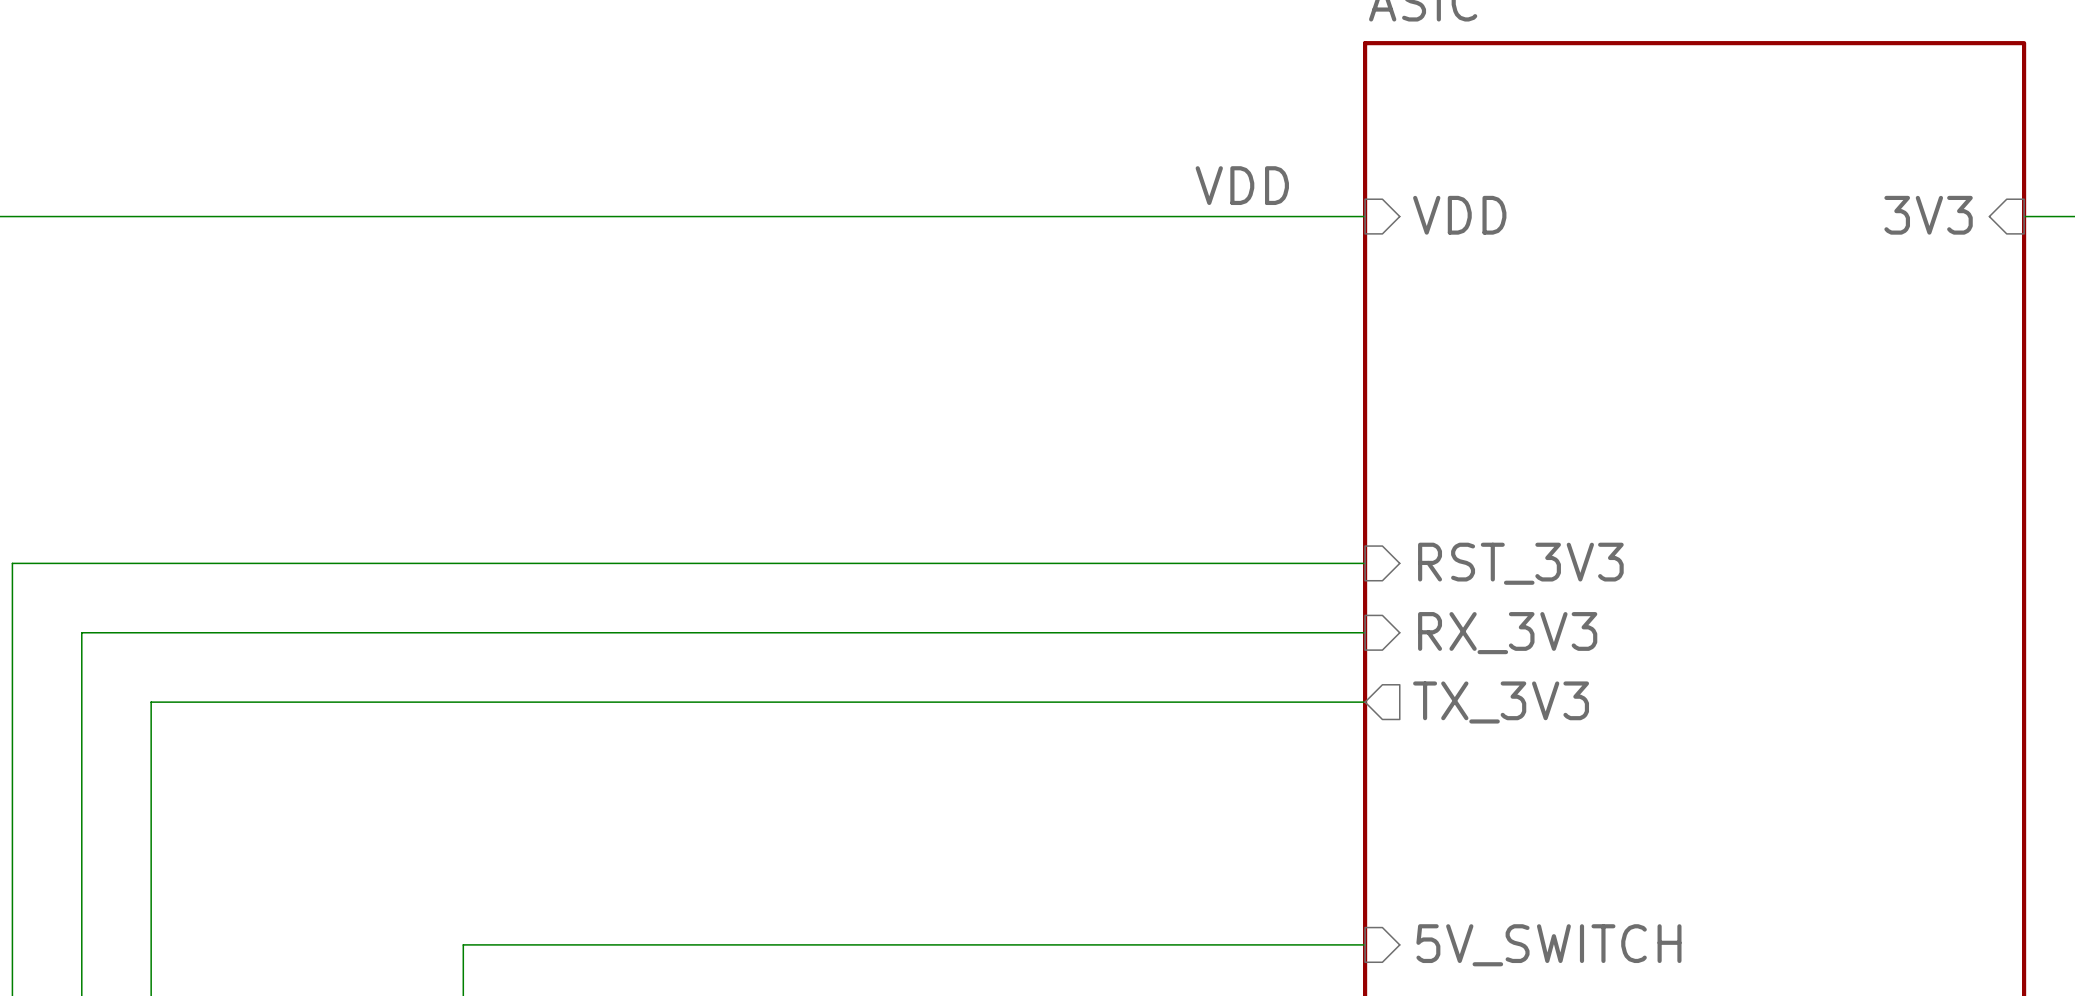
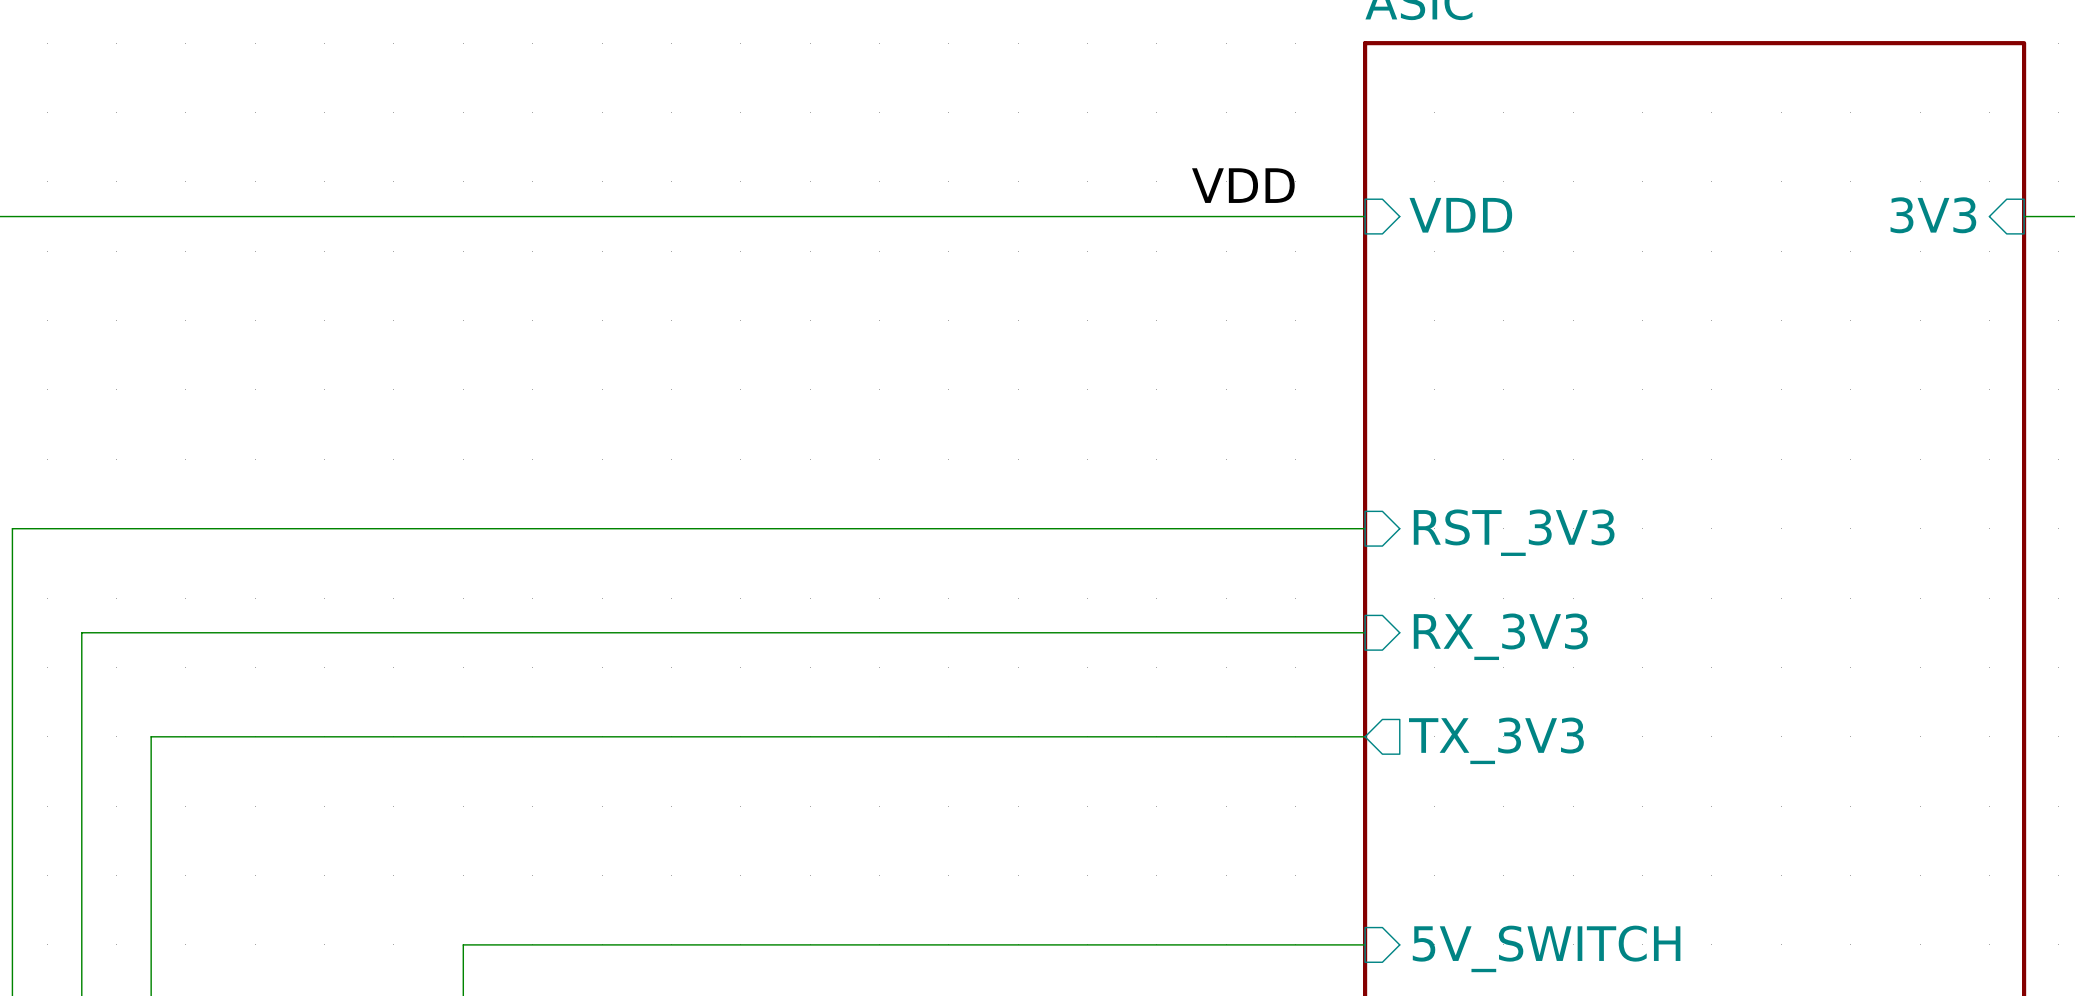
wire: (12, 563) (1365, 563) -> (12, 563) (12, 528) (1365, 528)
sheet pin position: RST_3V3 (1520, 563) -> RST_3V3 (1514, 532)
wire: (1365, 702) (151, 702) (151, 736) -> (1365, 736) (151, 736)
sheet pin position: TX_3V3 (1501, 702) -> TX_3V3 (1496, 740)

